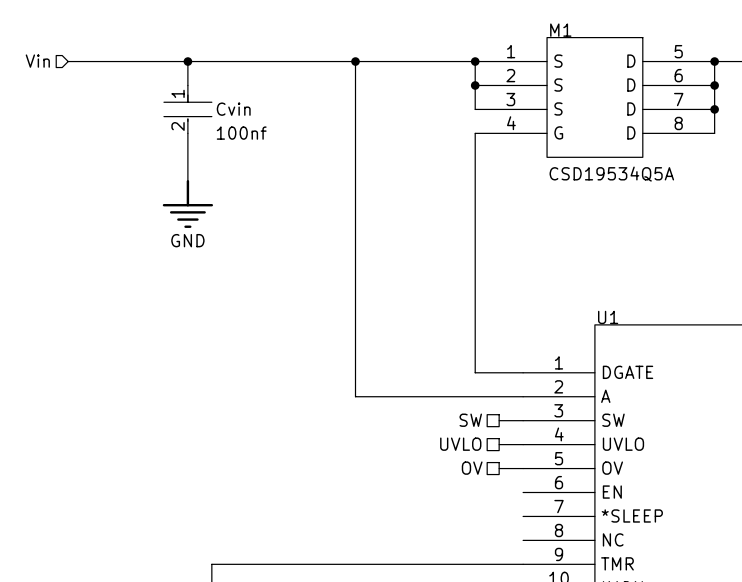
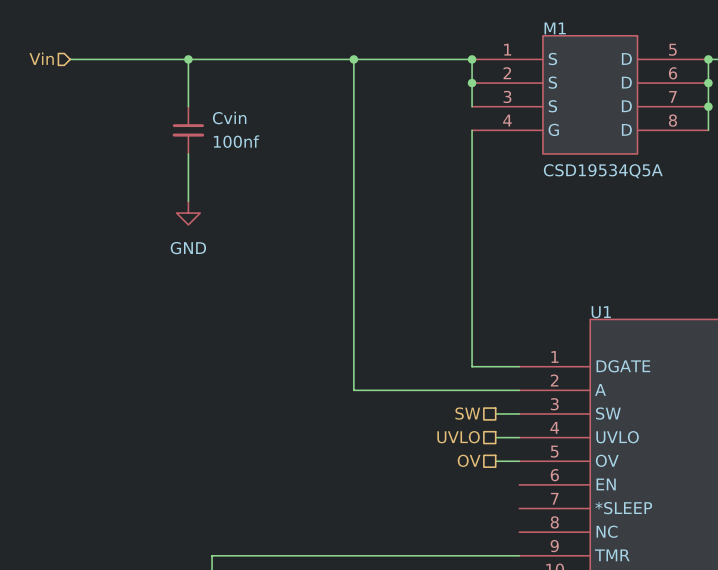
Cvin: 100nf (187, 109) -> none
Cvin: none -> 100nf (188, 130)
power symbol: GND (187, 203) -> none
power symbol: none -> GND (188, 213)

